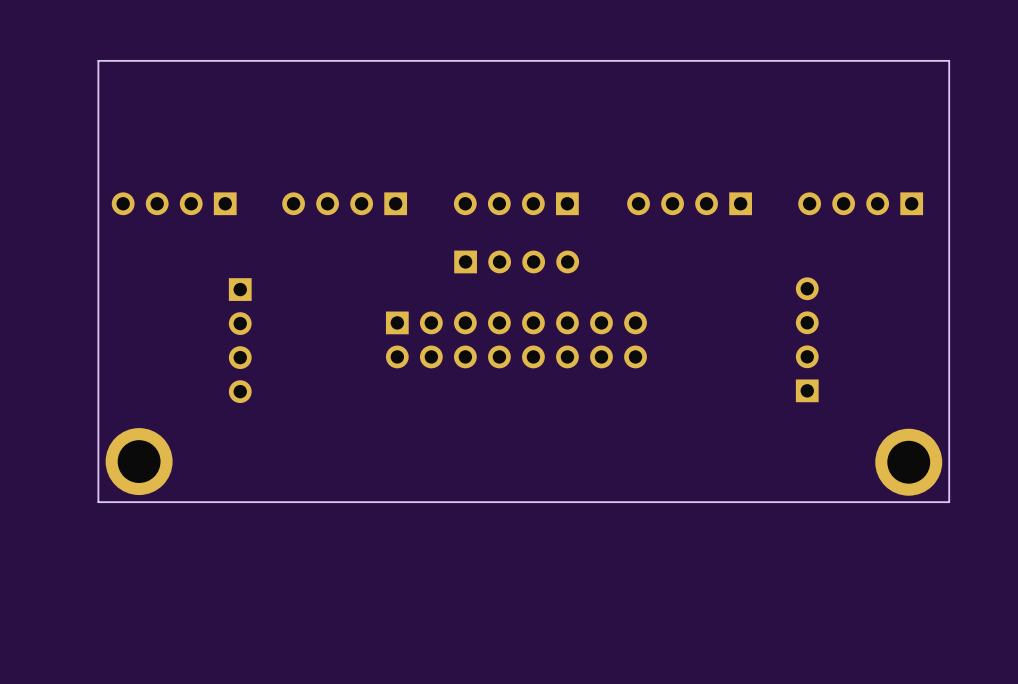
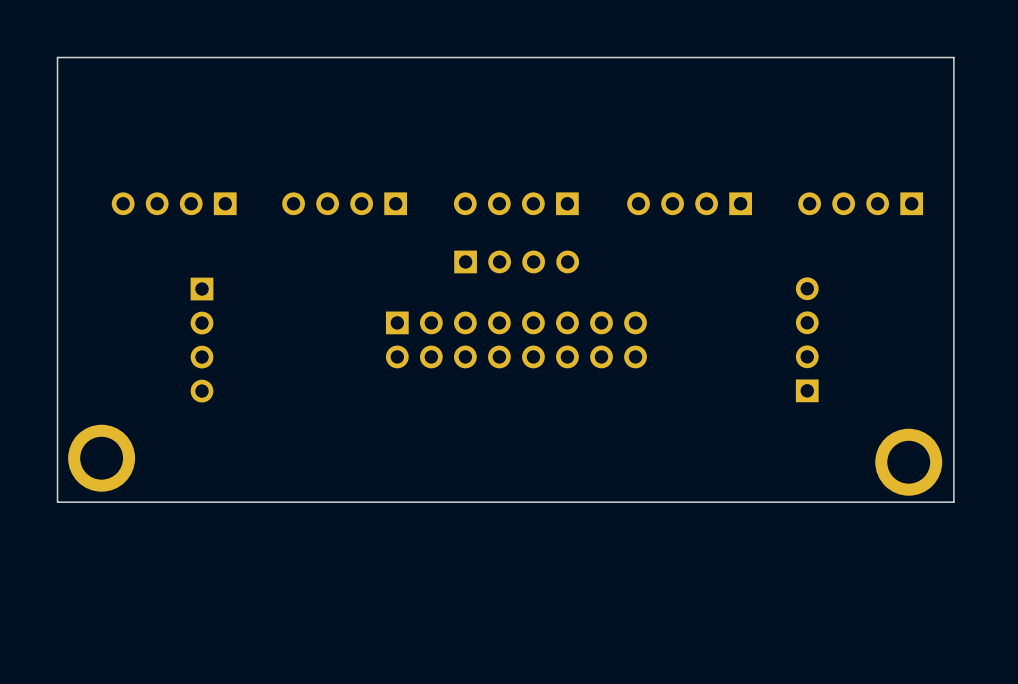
part position: (240, 340) -> (202, 340)
part position: (139, 461) -> (101, 458)
board edge: (949, 502) (949, 60) (98, 60) (98, 502) -> (949, 502) (953, 502) (953, 57) (57, 57) (57, 502) (98, 502)

